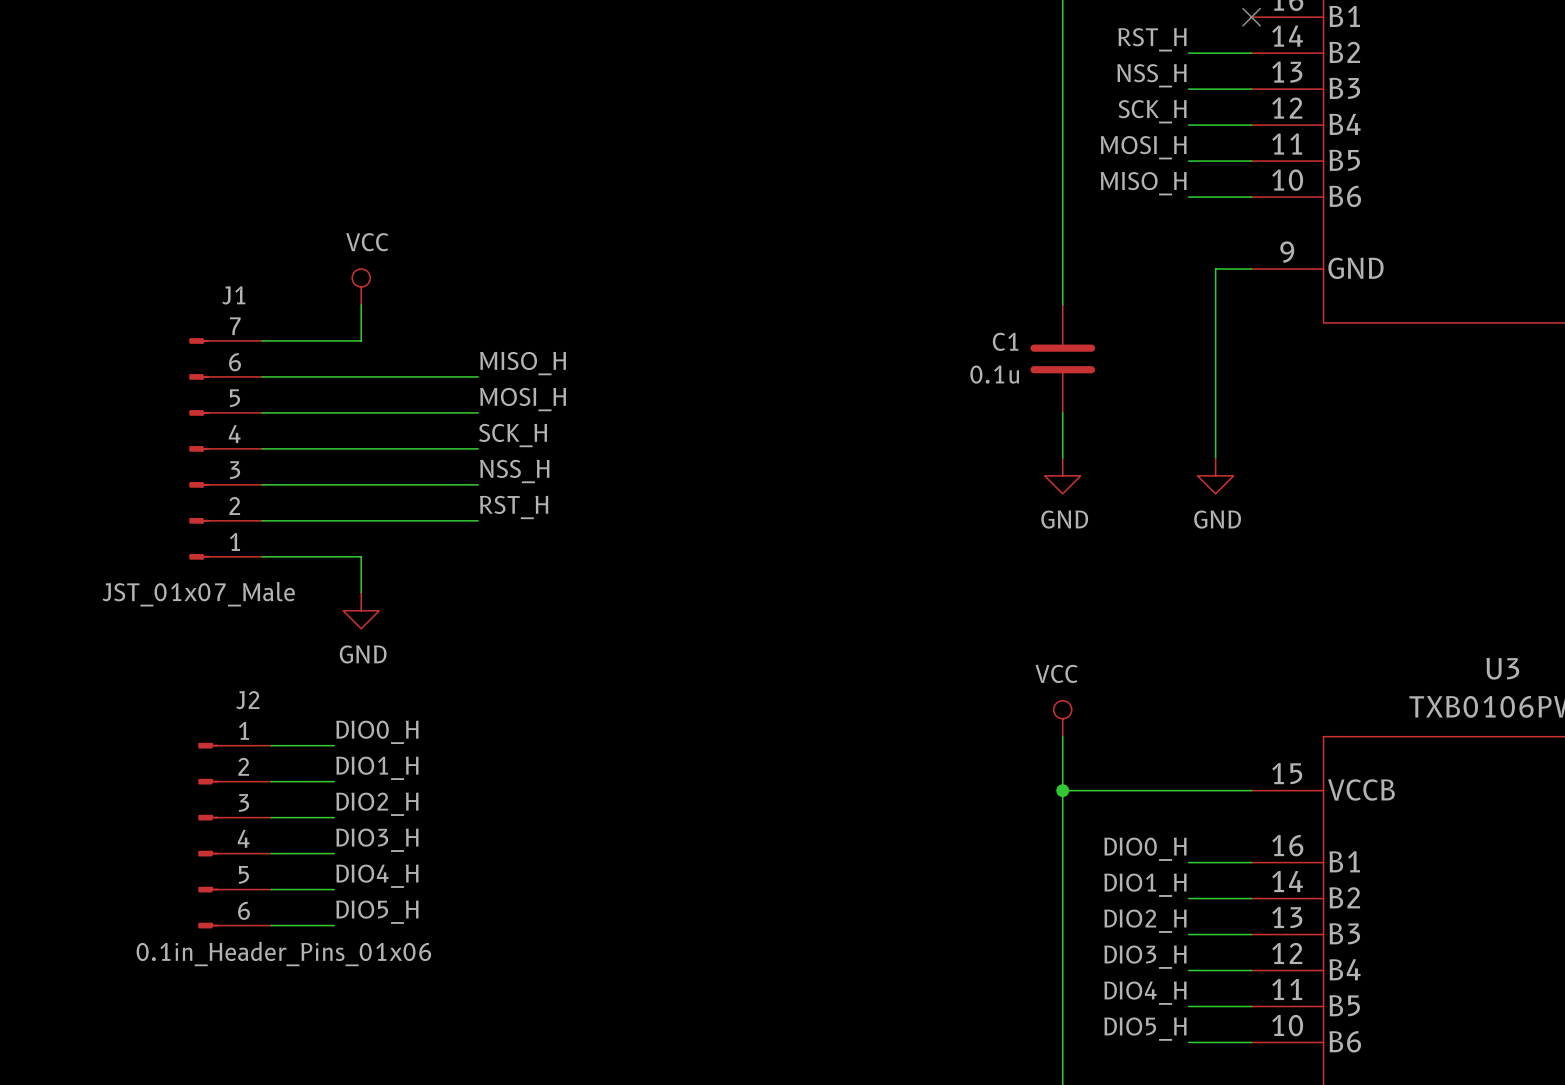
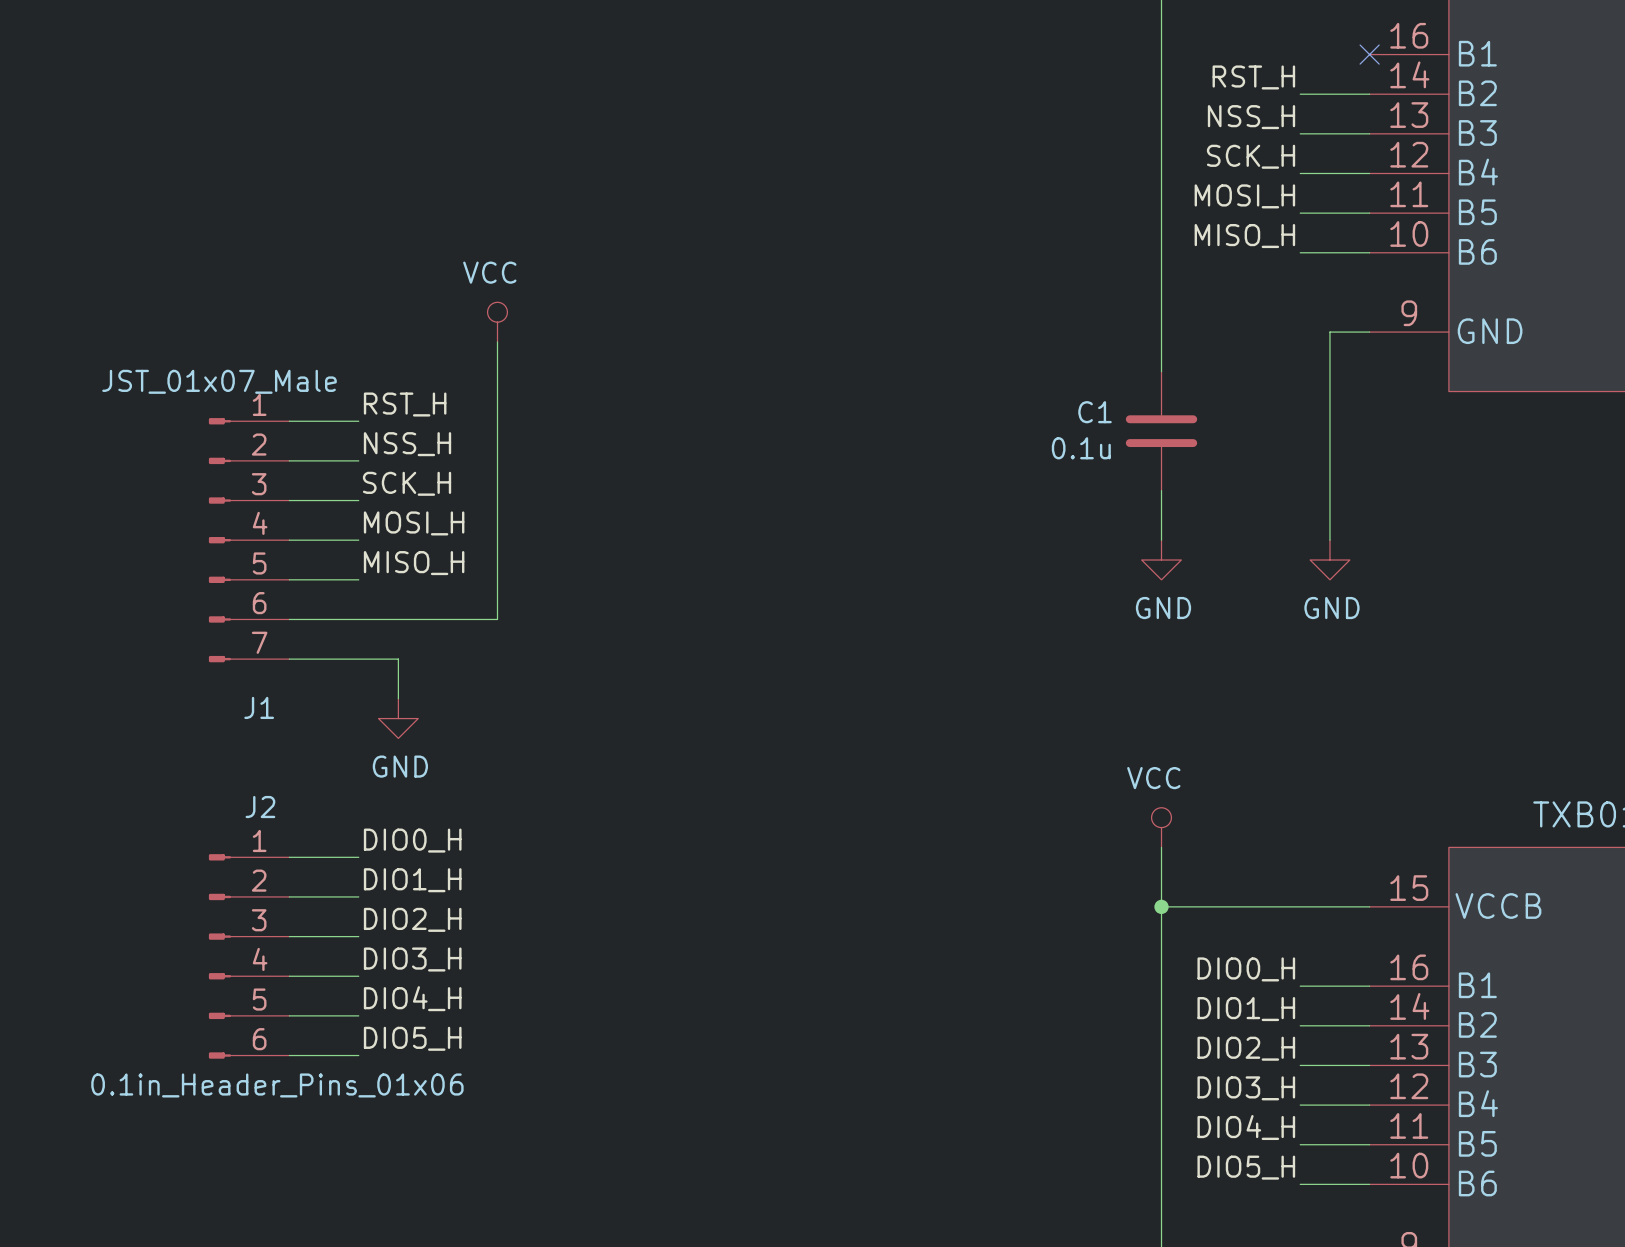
power symbol text position: VCC (367, 242) -> VCC (489, 272)
wire: none -> (497, 341) (497, 619) (289, 619)
power symbol position: VCC (361, 286) -> VCC (497, 322)
wire: (361, 304) (361, 340) (262, 340) -> none
wire: none -> (289, 421) (358, 421)
label position: MISO_H (523, 363) -> MISO_H (414, 563)
wire: (262, 376) (478, 376) -> none
wire: none -> (289, 460) (358, 460)
label position: MOSI_H (523, 399) -> MOSI_H (414, 523)
wire: (262, 412) (478, 412) -> none
wire: none -> (289, 500) (358, 500)
label position: SCK_H (513, 435) -> SCK_H (407, 483)
J1 flip: as is (199, 448) -> up-down (220, 540)
wire: (262, 448) (478, 448) -> none
wire: none -> (289, 540) (358, 540)
label position: NSS_H (514, 471) -> NSS_H (407, 444)
wire: (262, 484) (478, 484) -> none
wire: none -> (289, 579) (358, 579)
label position: RST_H (514, 507) -> RST_H (405, 404)
wire: (262, 520) (478, 520) -> none
wire: (262, 556) (361, 556) (361, 592) -> (289, 659) (398, 659) (398, 698)
power symbol position: GND (361, 610) -> GND (398, 718)

